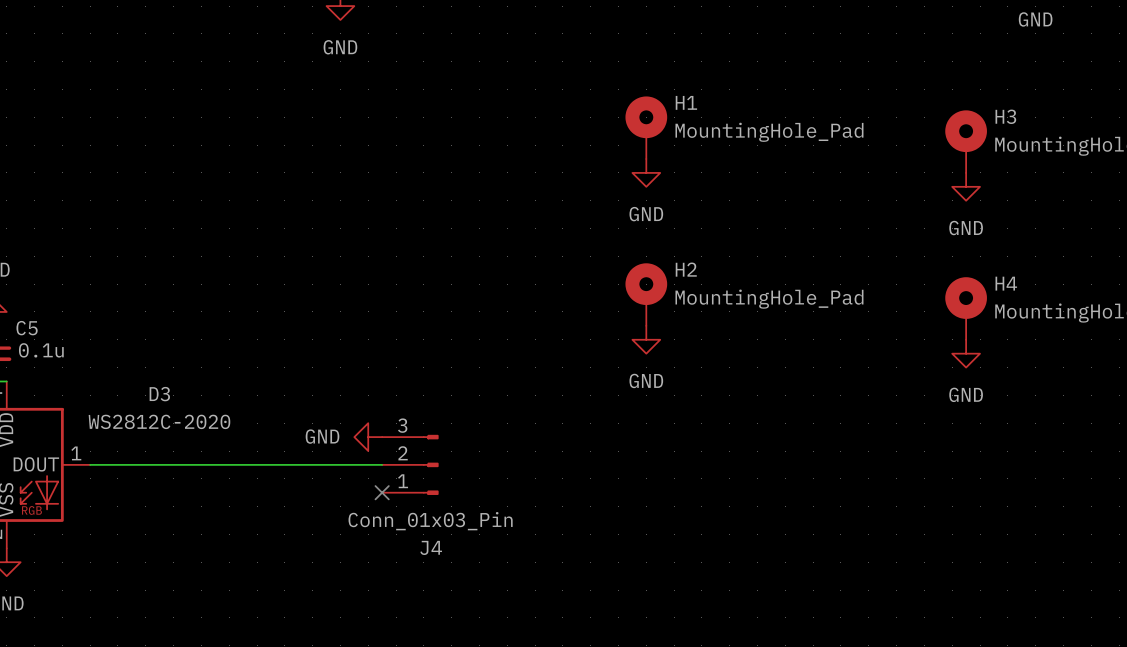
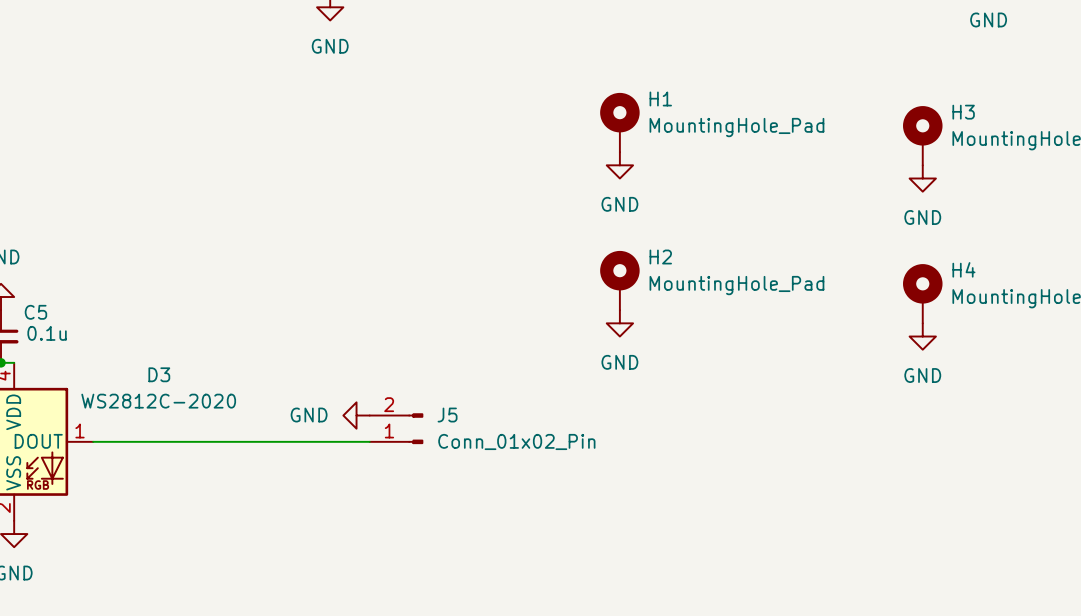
J5: none -> Conn_01x02_Pin (396, 428)
J4: Conn_01x03_Pin (410, 464) -> none
no-connect mark: (382, 492) -> none

